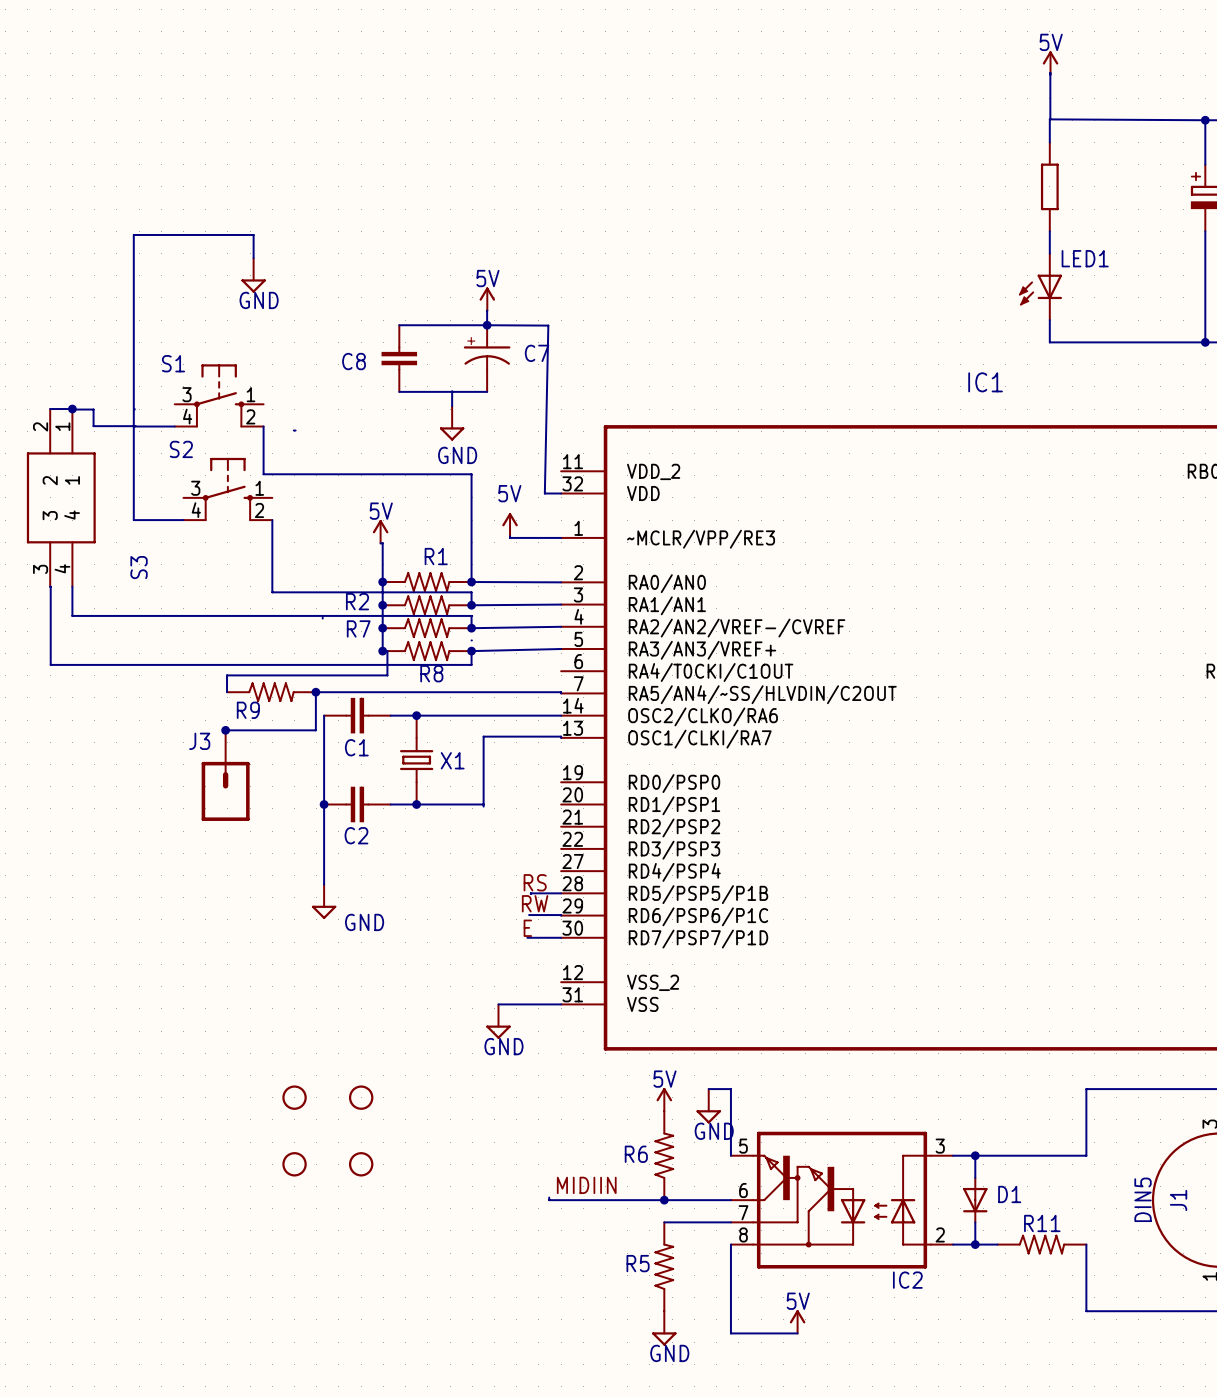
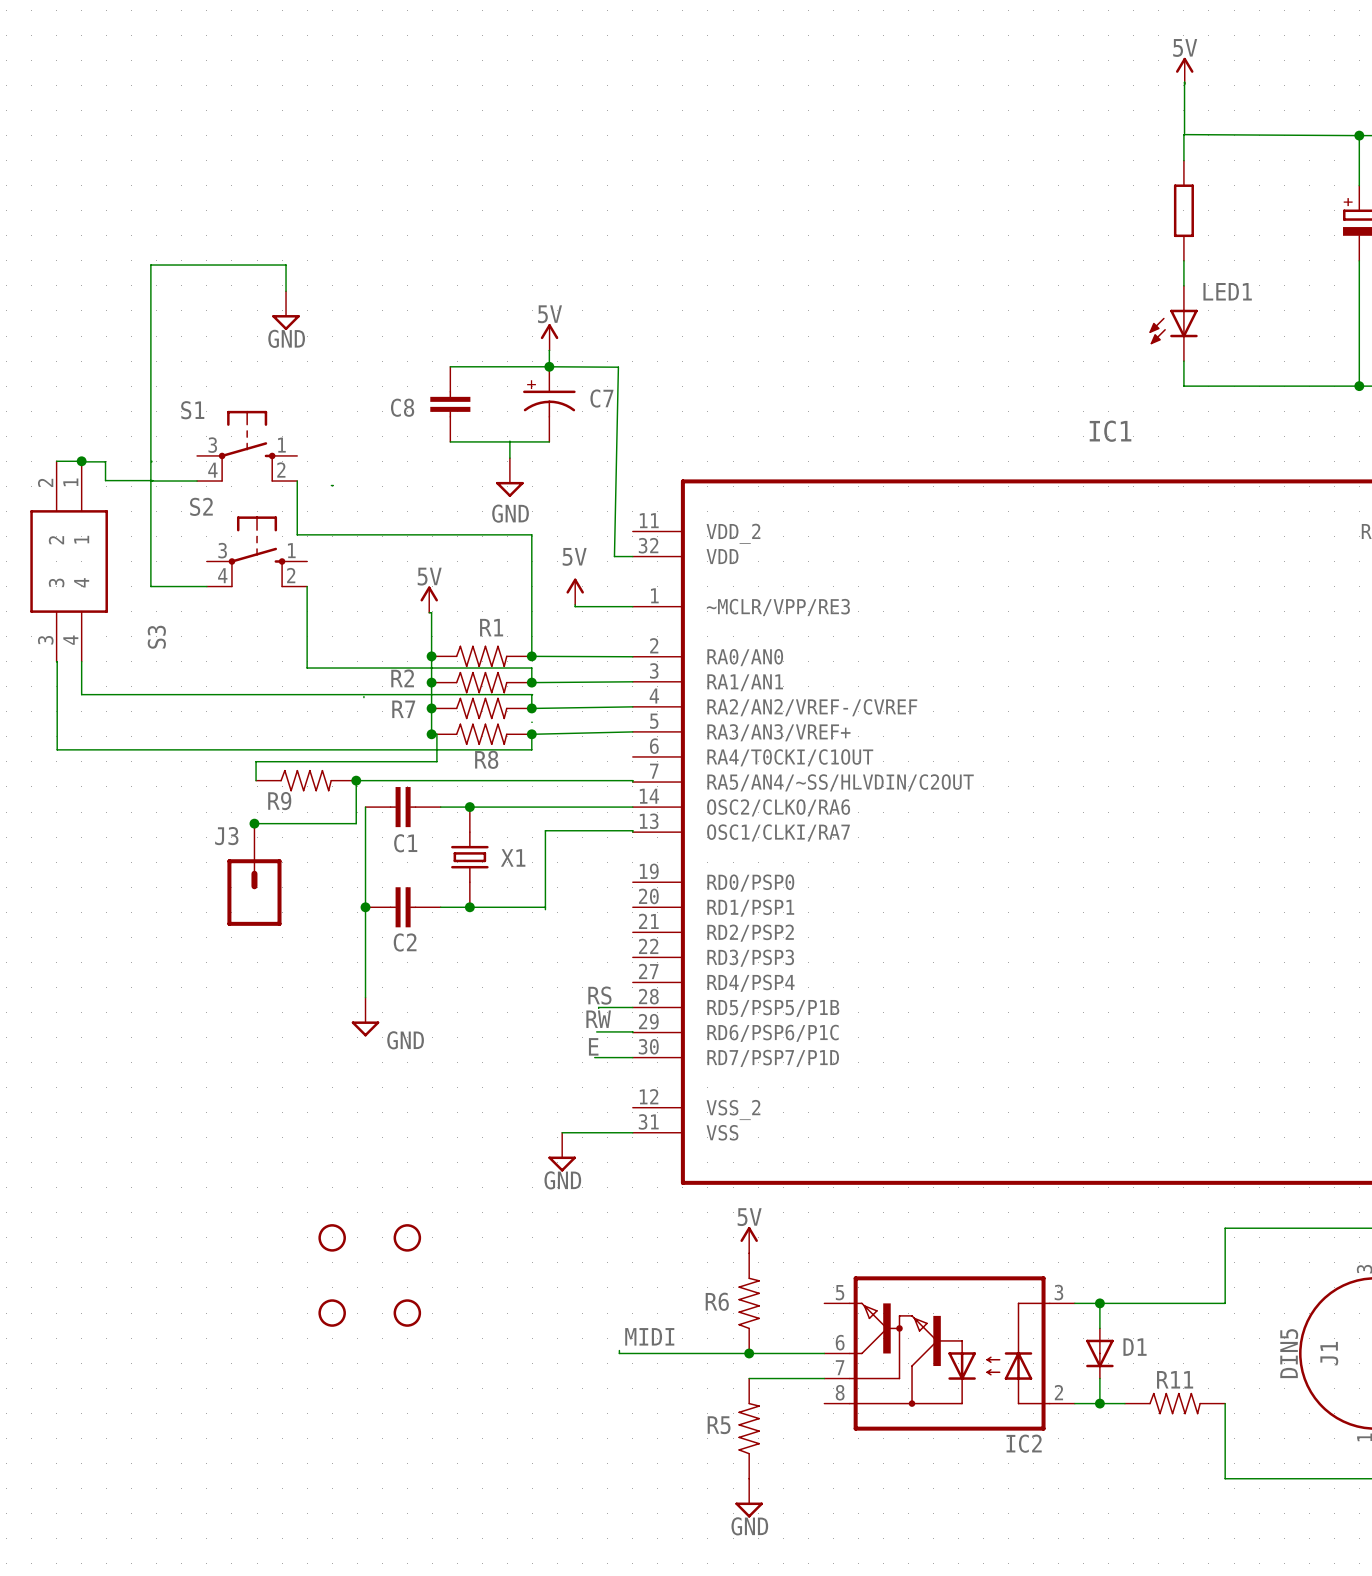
wire: (708, 1089) (730, 1089) (730, 1155) -> none
power symbol: GND (708, 1106) -> none
label: MIDIIN (586, 1185) -> MIDI (649, 1336)
wire: (730, 1244) (730, 1333) (797, 1333) -> none
power symbol: 5V (797, 1321) -> none

